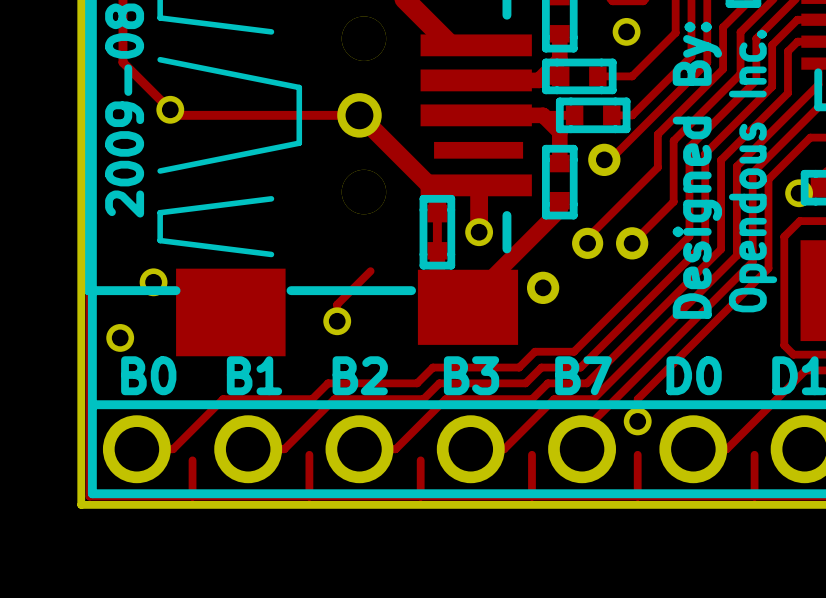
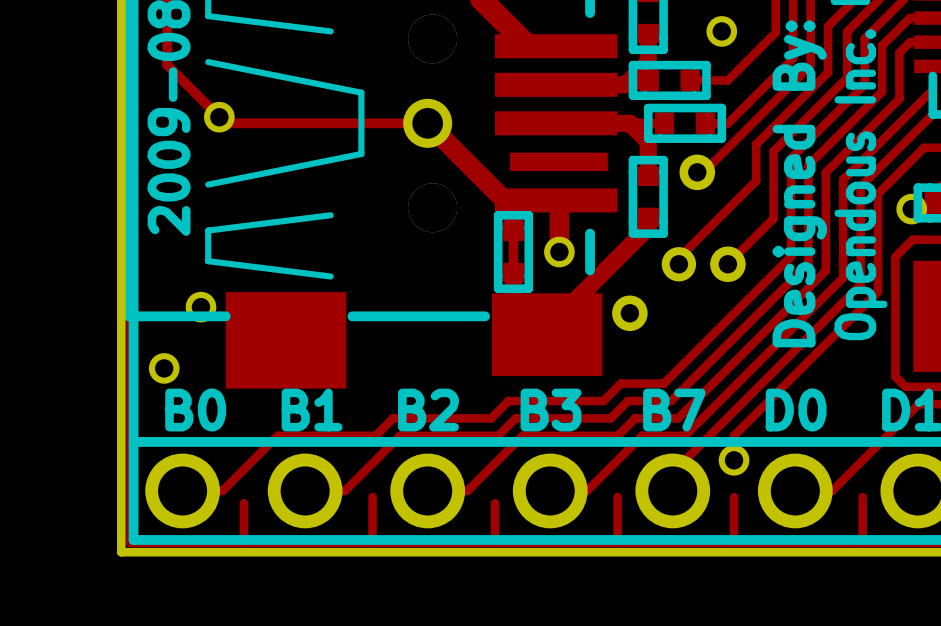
track: (370, 271) (337, 304) (337, 321) -> none
part: (337, 321) -> none

